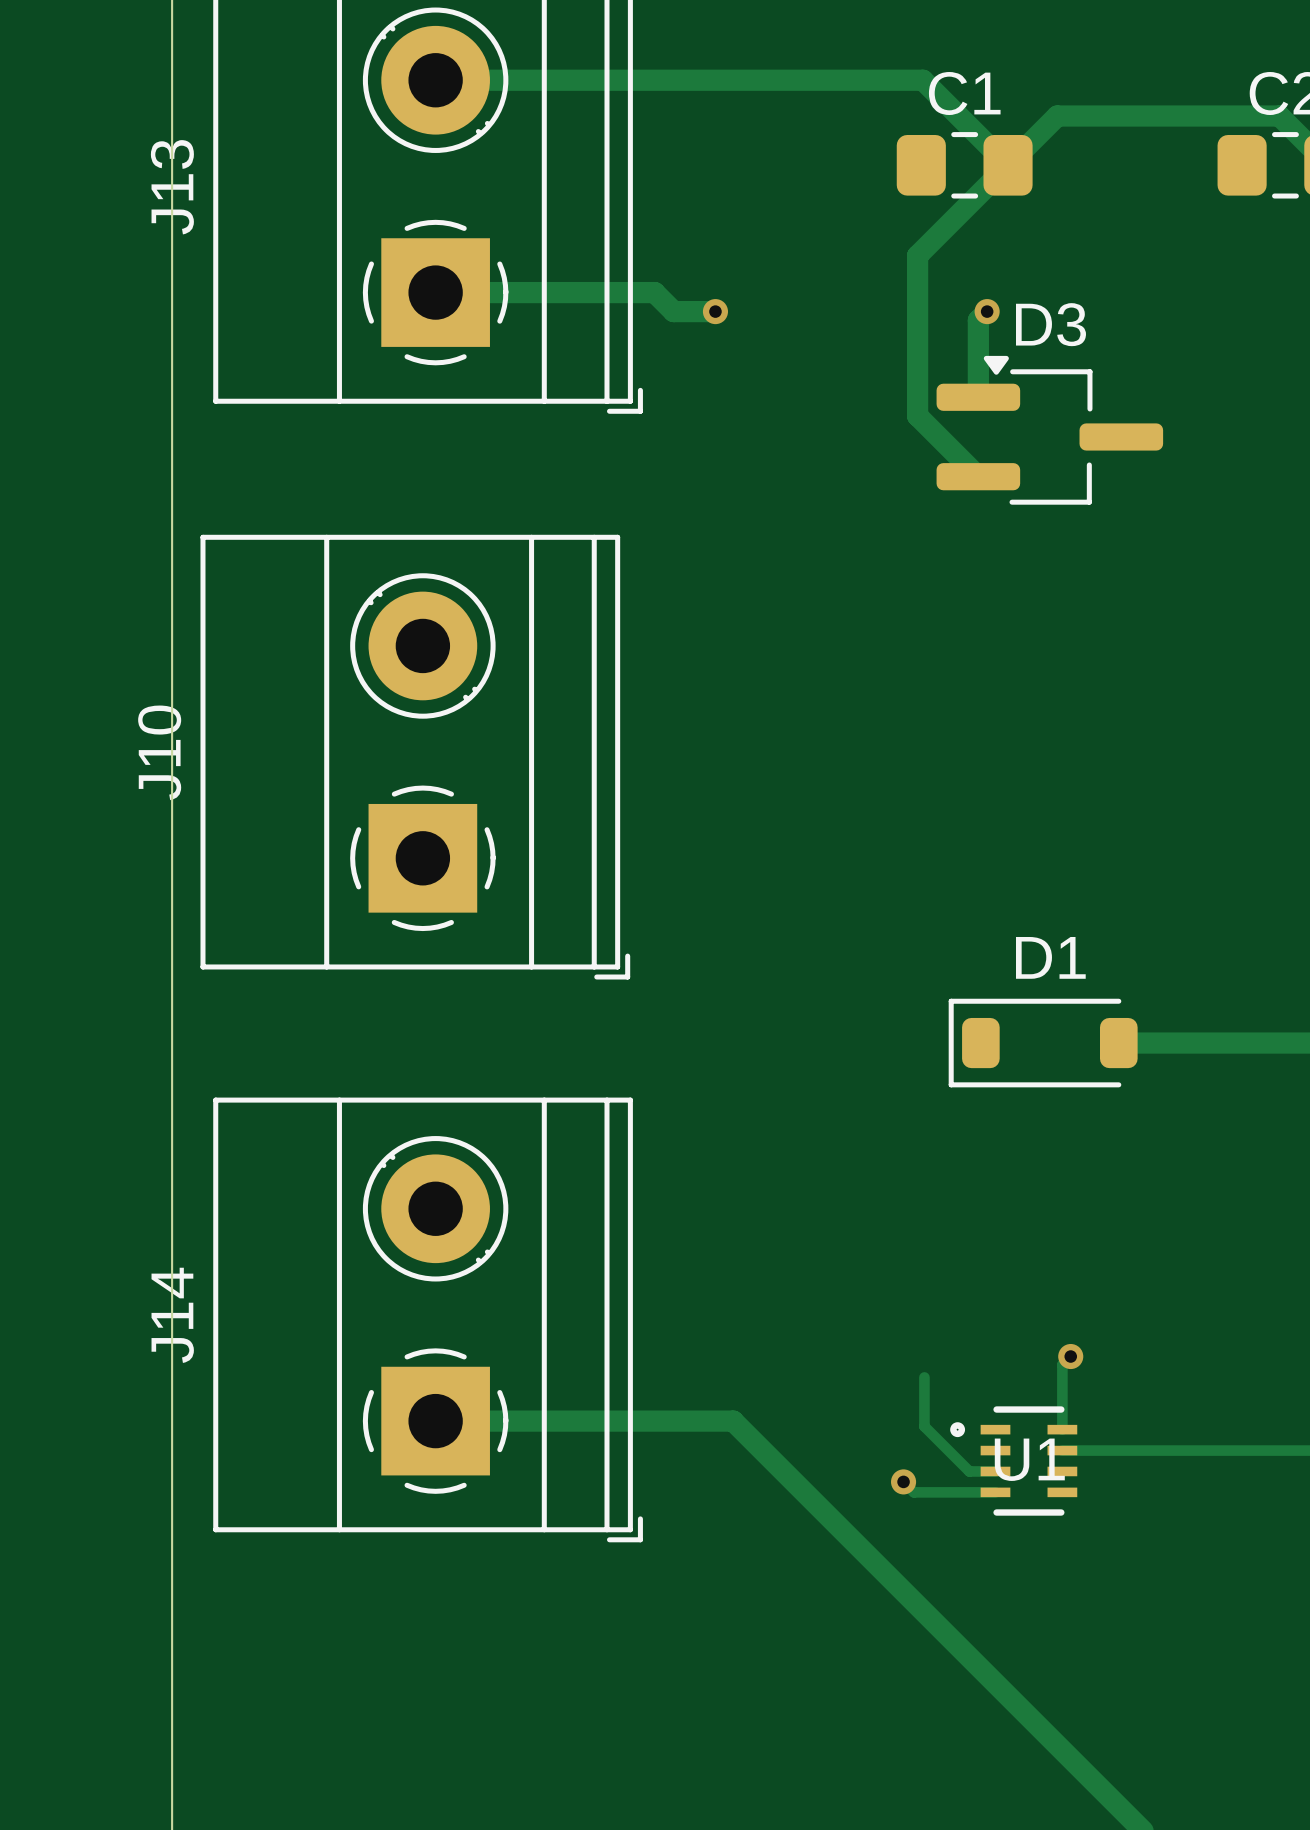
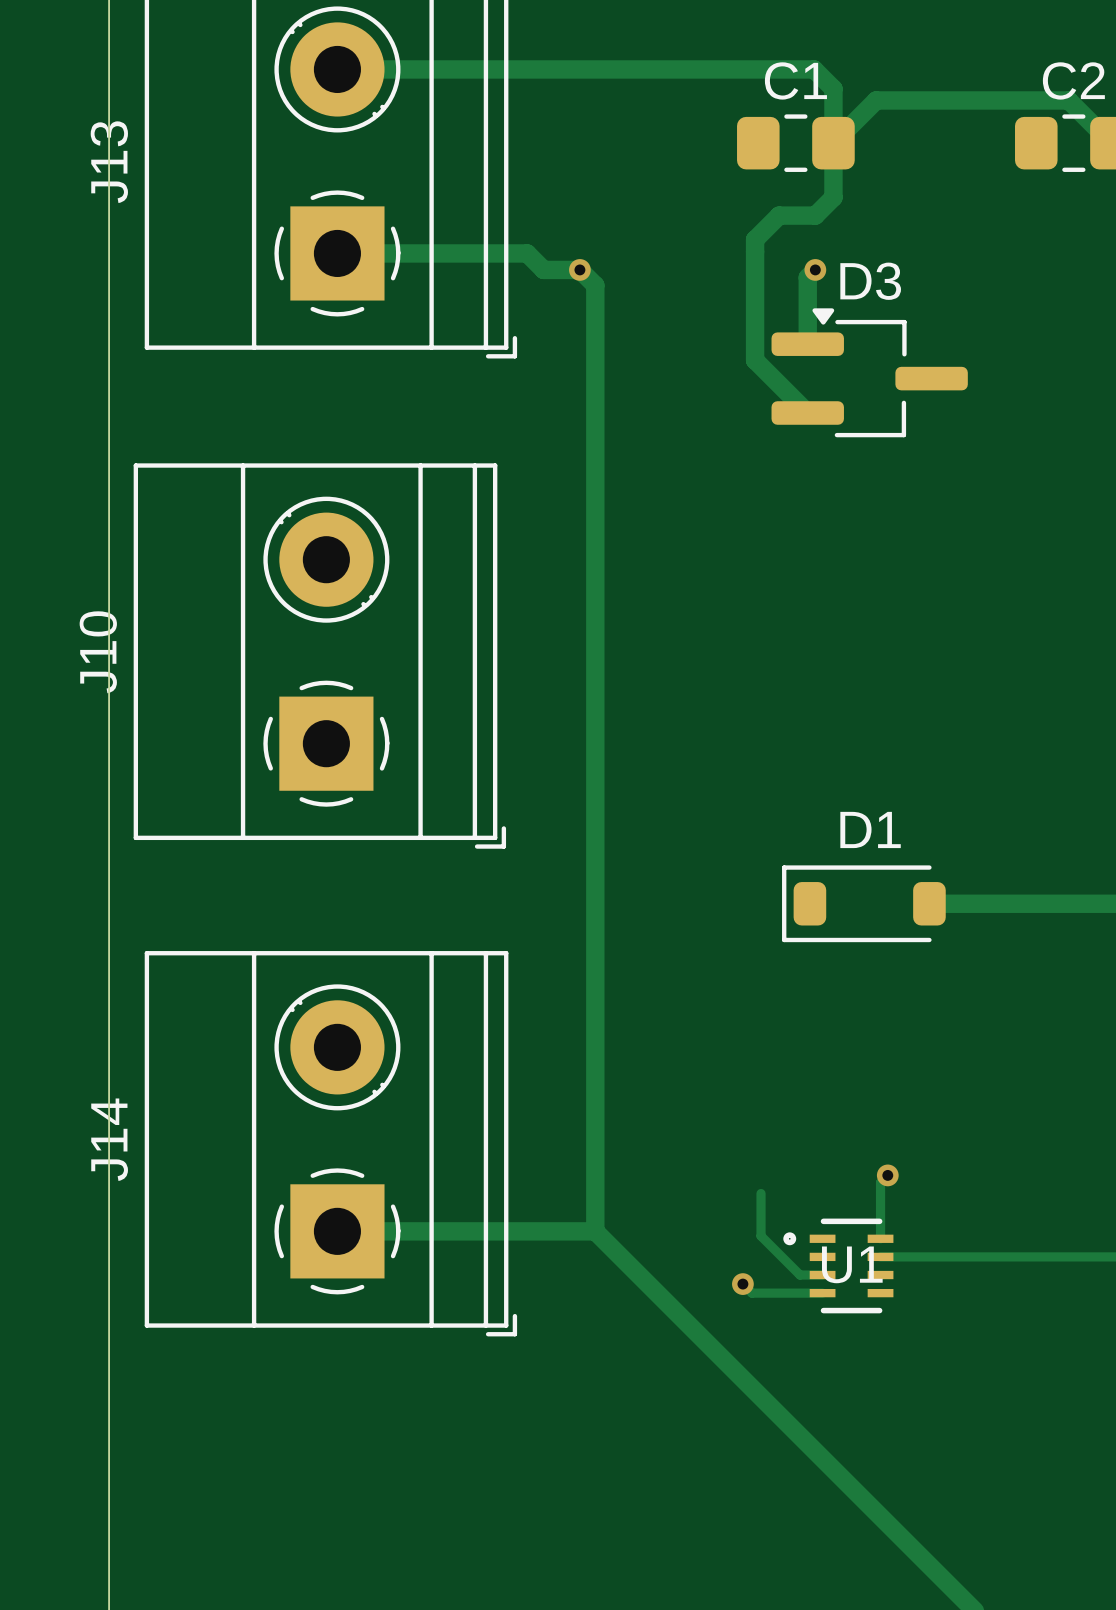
track: (922, 80) (1008, 165) (917, 255) (917, 276) -> (759, 69) (814, 69) (833, 88) (833, 197) (815, 215) (779, 215) (755, 239)
track: none -> (579, 269) (595, 285) (595, 1231)

